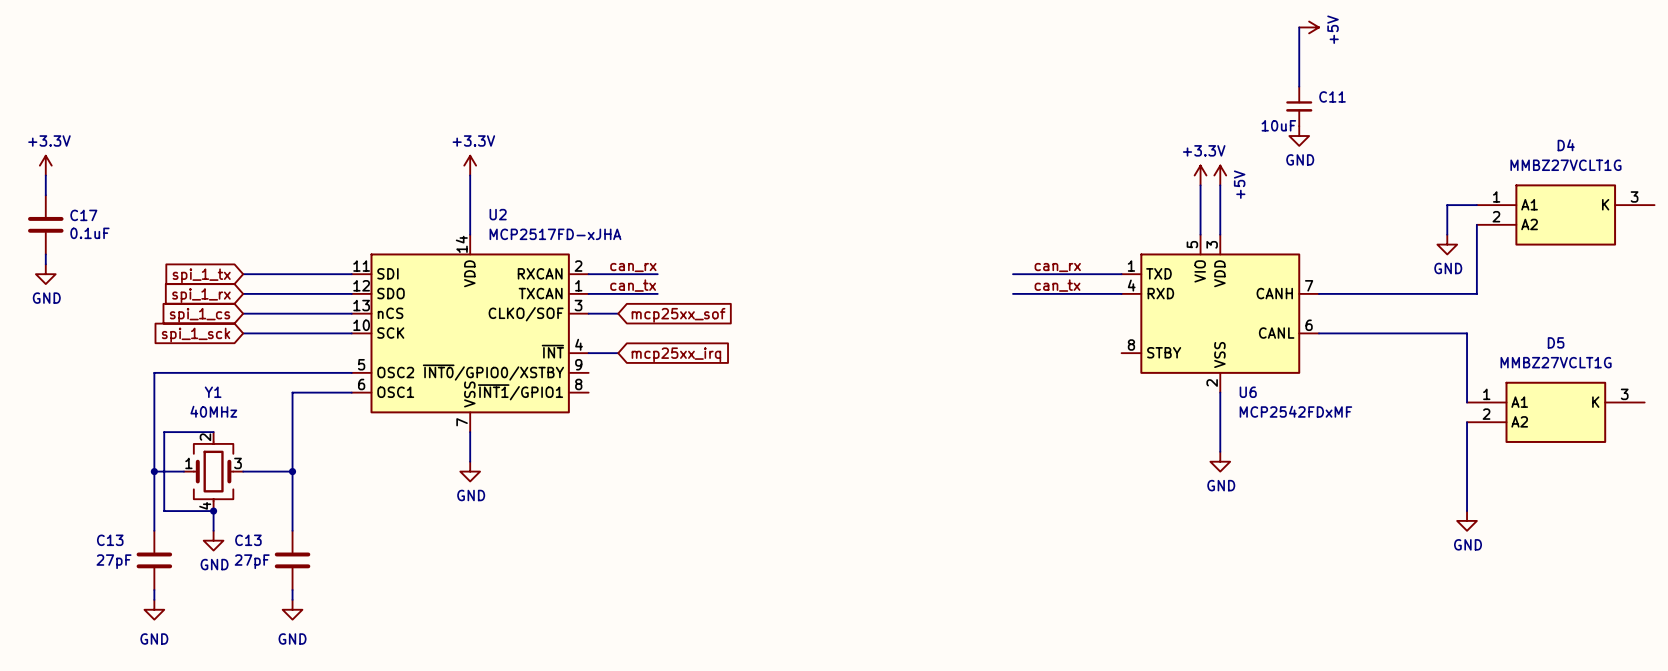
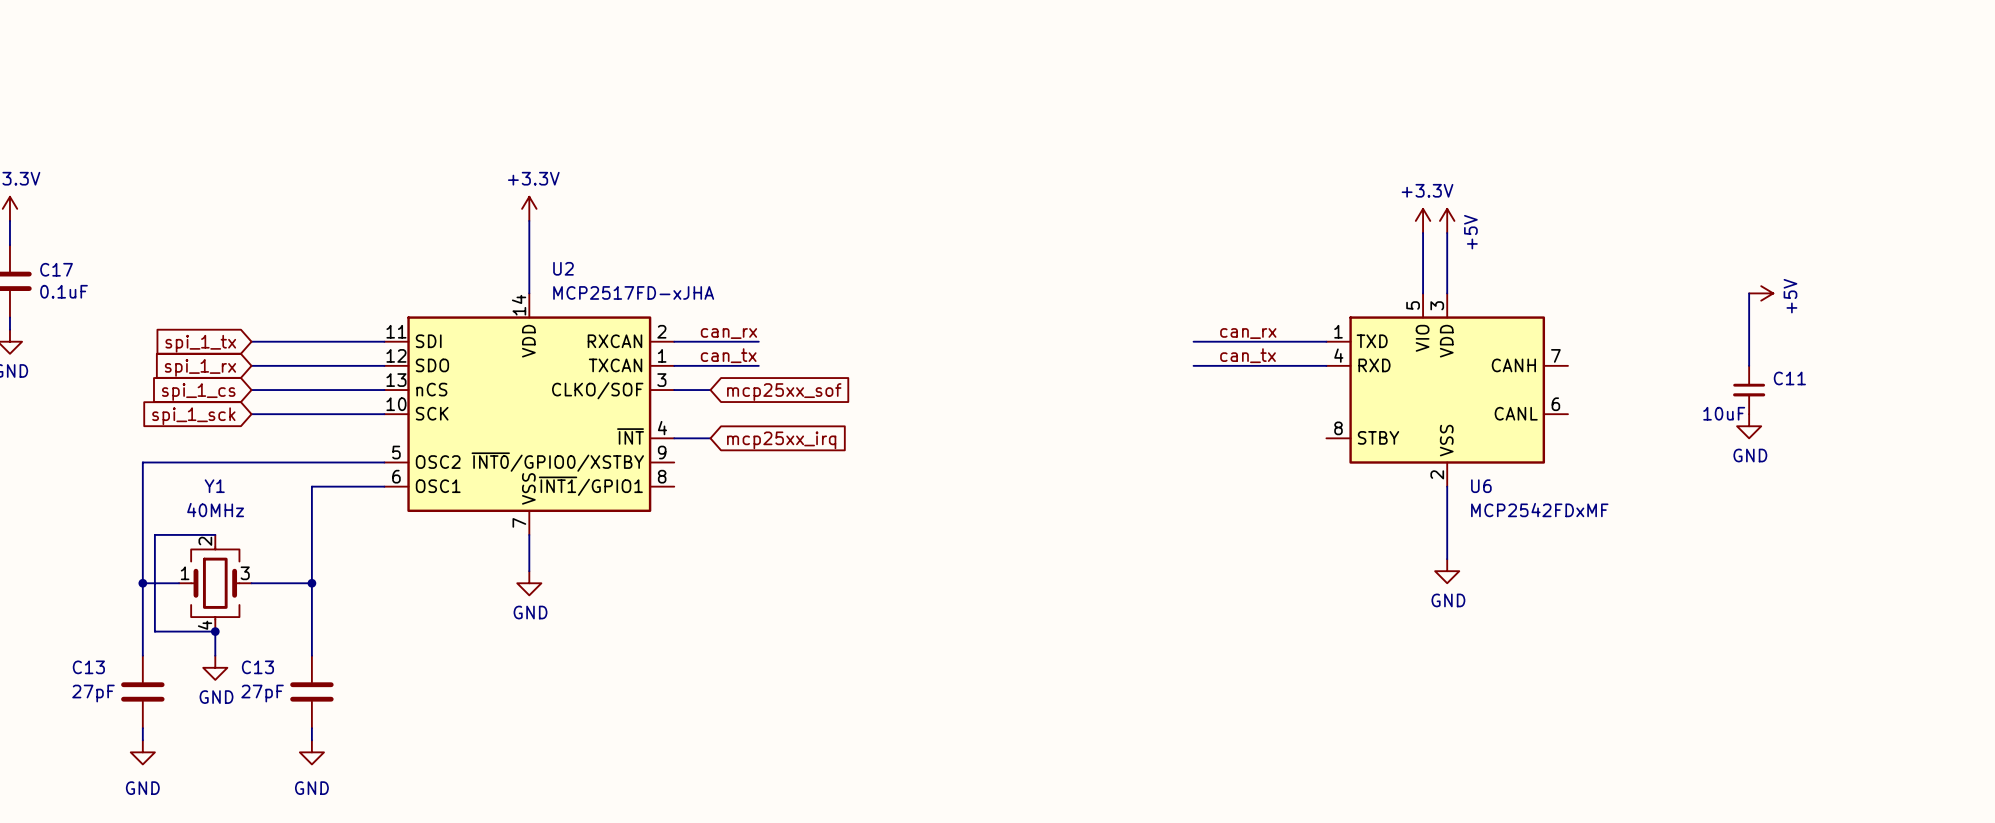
wire: (1299, 27) (1299, 86) -> none
power symbol: +5V (1309, 27) -> none
C11 position: (1299, 106) -> (1749, 390)
power symbol: GND (1299, 136) -> none
wire: (1476, 205) (1447, 205) (1447, 234) -> none
D4: MMBZ27VCLT1G (1565, 214) -> none
wire: (1476, 224) (1476, 293) (1318, 293) -> none
wire: none -> (1749, 293) (1749, 365)
power symbol: none -> +5V (1761, 293)
power symbol: GND (1447, 244) -> none
wire: (1318, 333) (1467, 333) (1467, 402) -> none
power symbol: none -> GND (1749, 426)
D5: MMBZ27VCLT1G (1555, 412) -> none
wire: (1467, 422) (1467, 511) -> none
power symbol: GND (1467, 520) -> none

